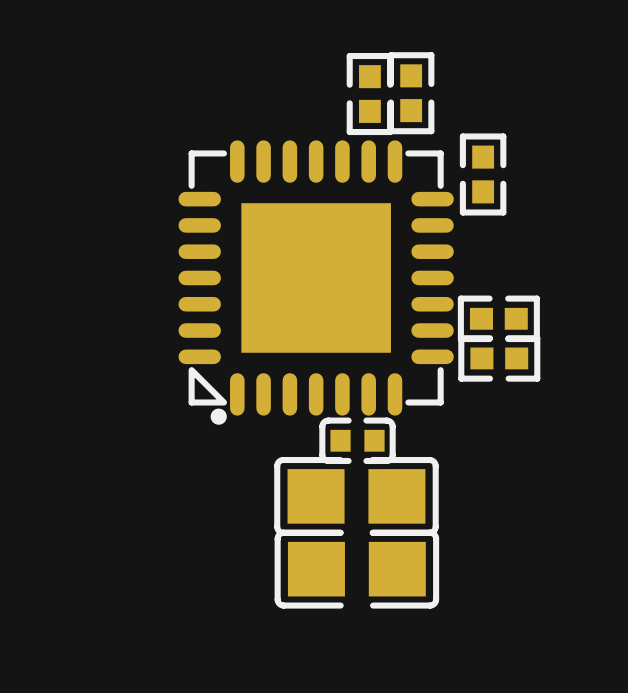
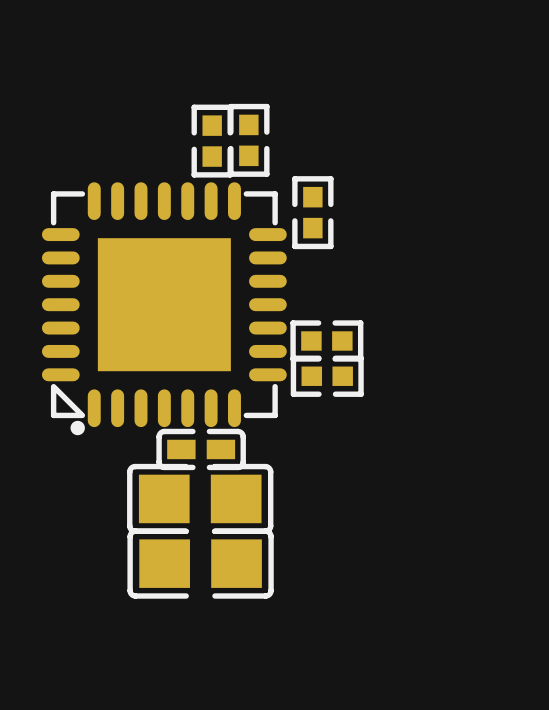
part footprint: [319, 417, 396, 465] -> [156, 428, 246, 471]

